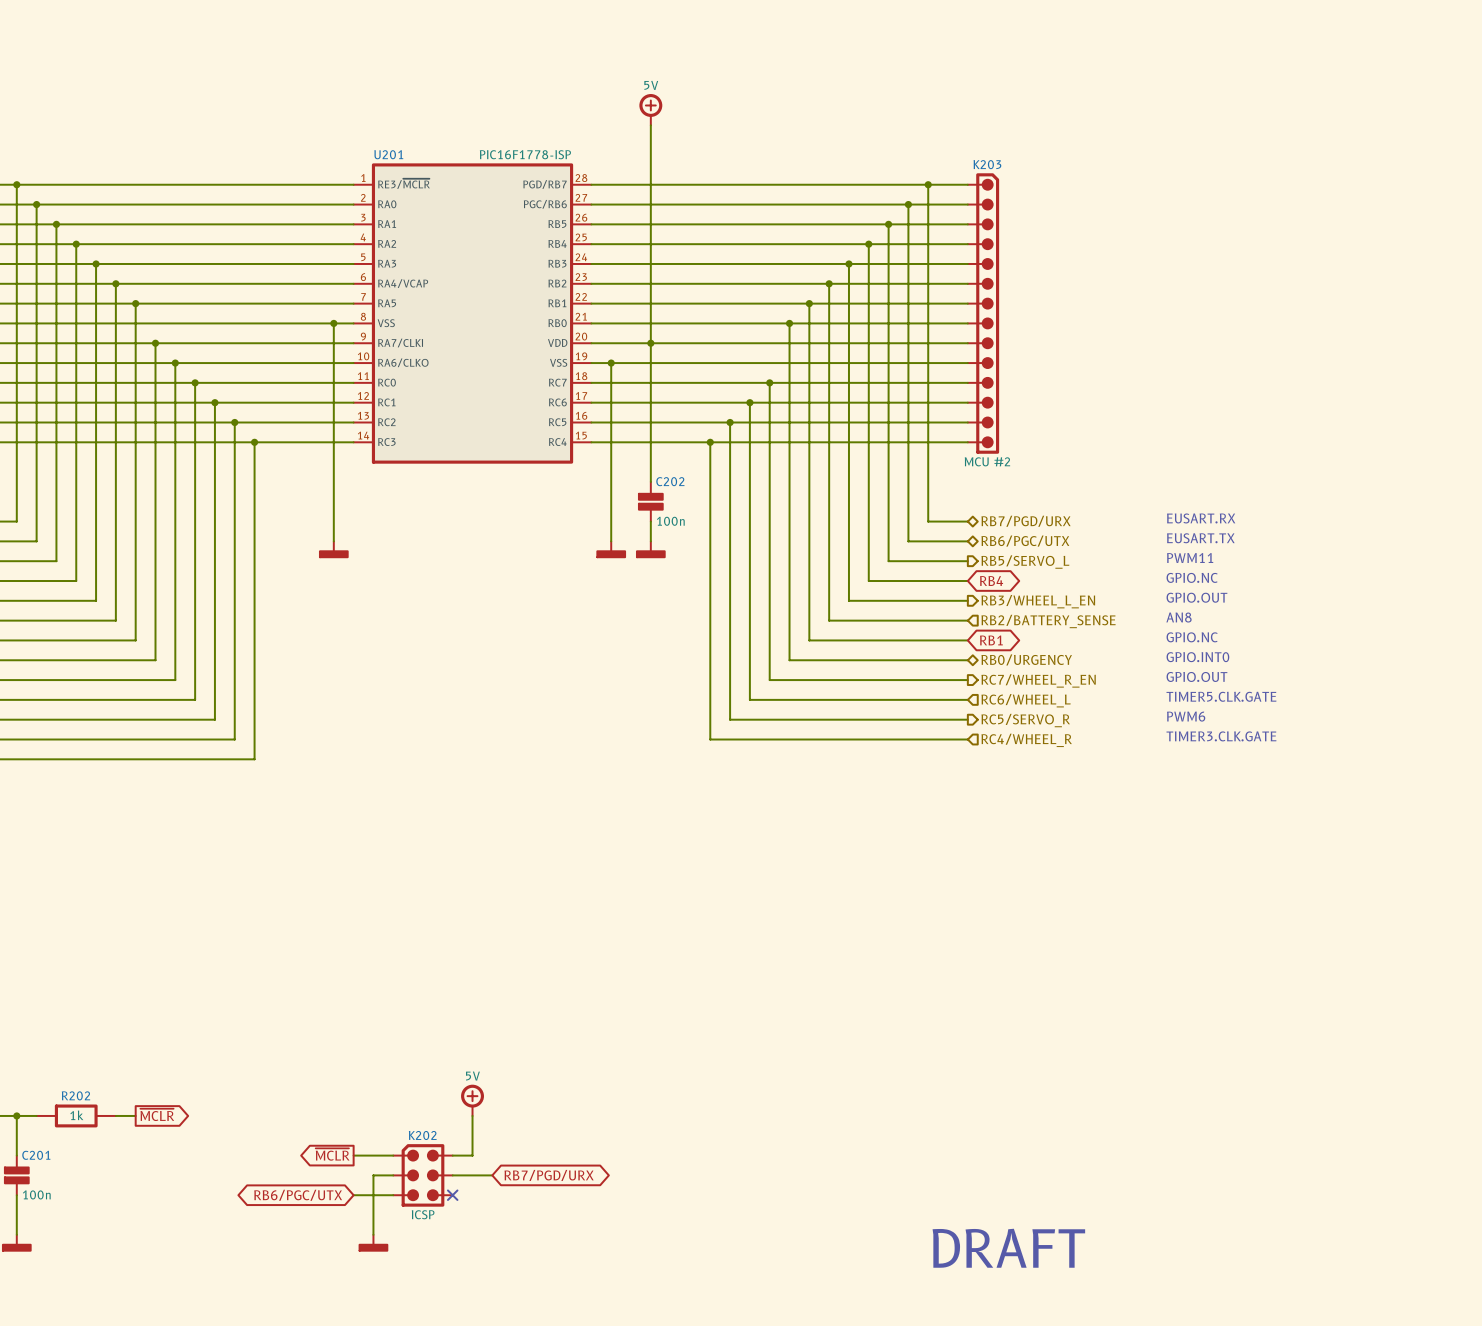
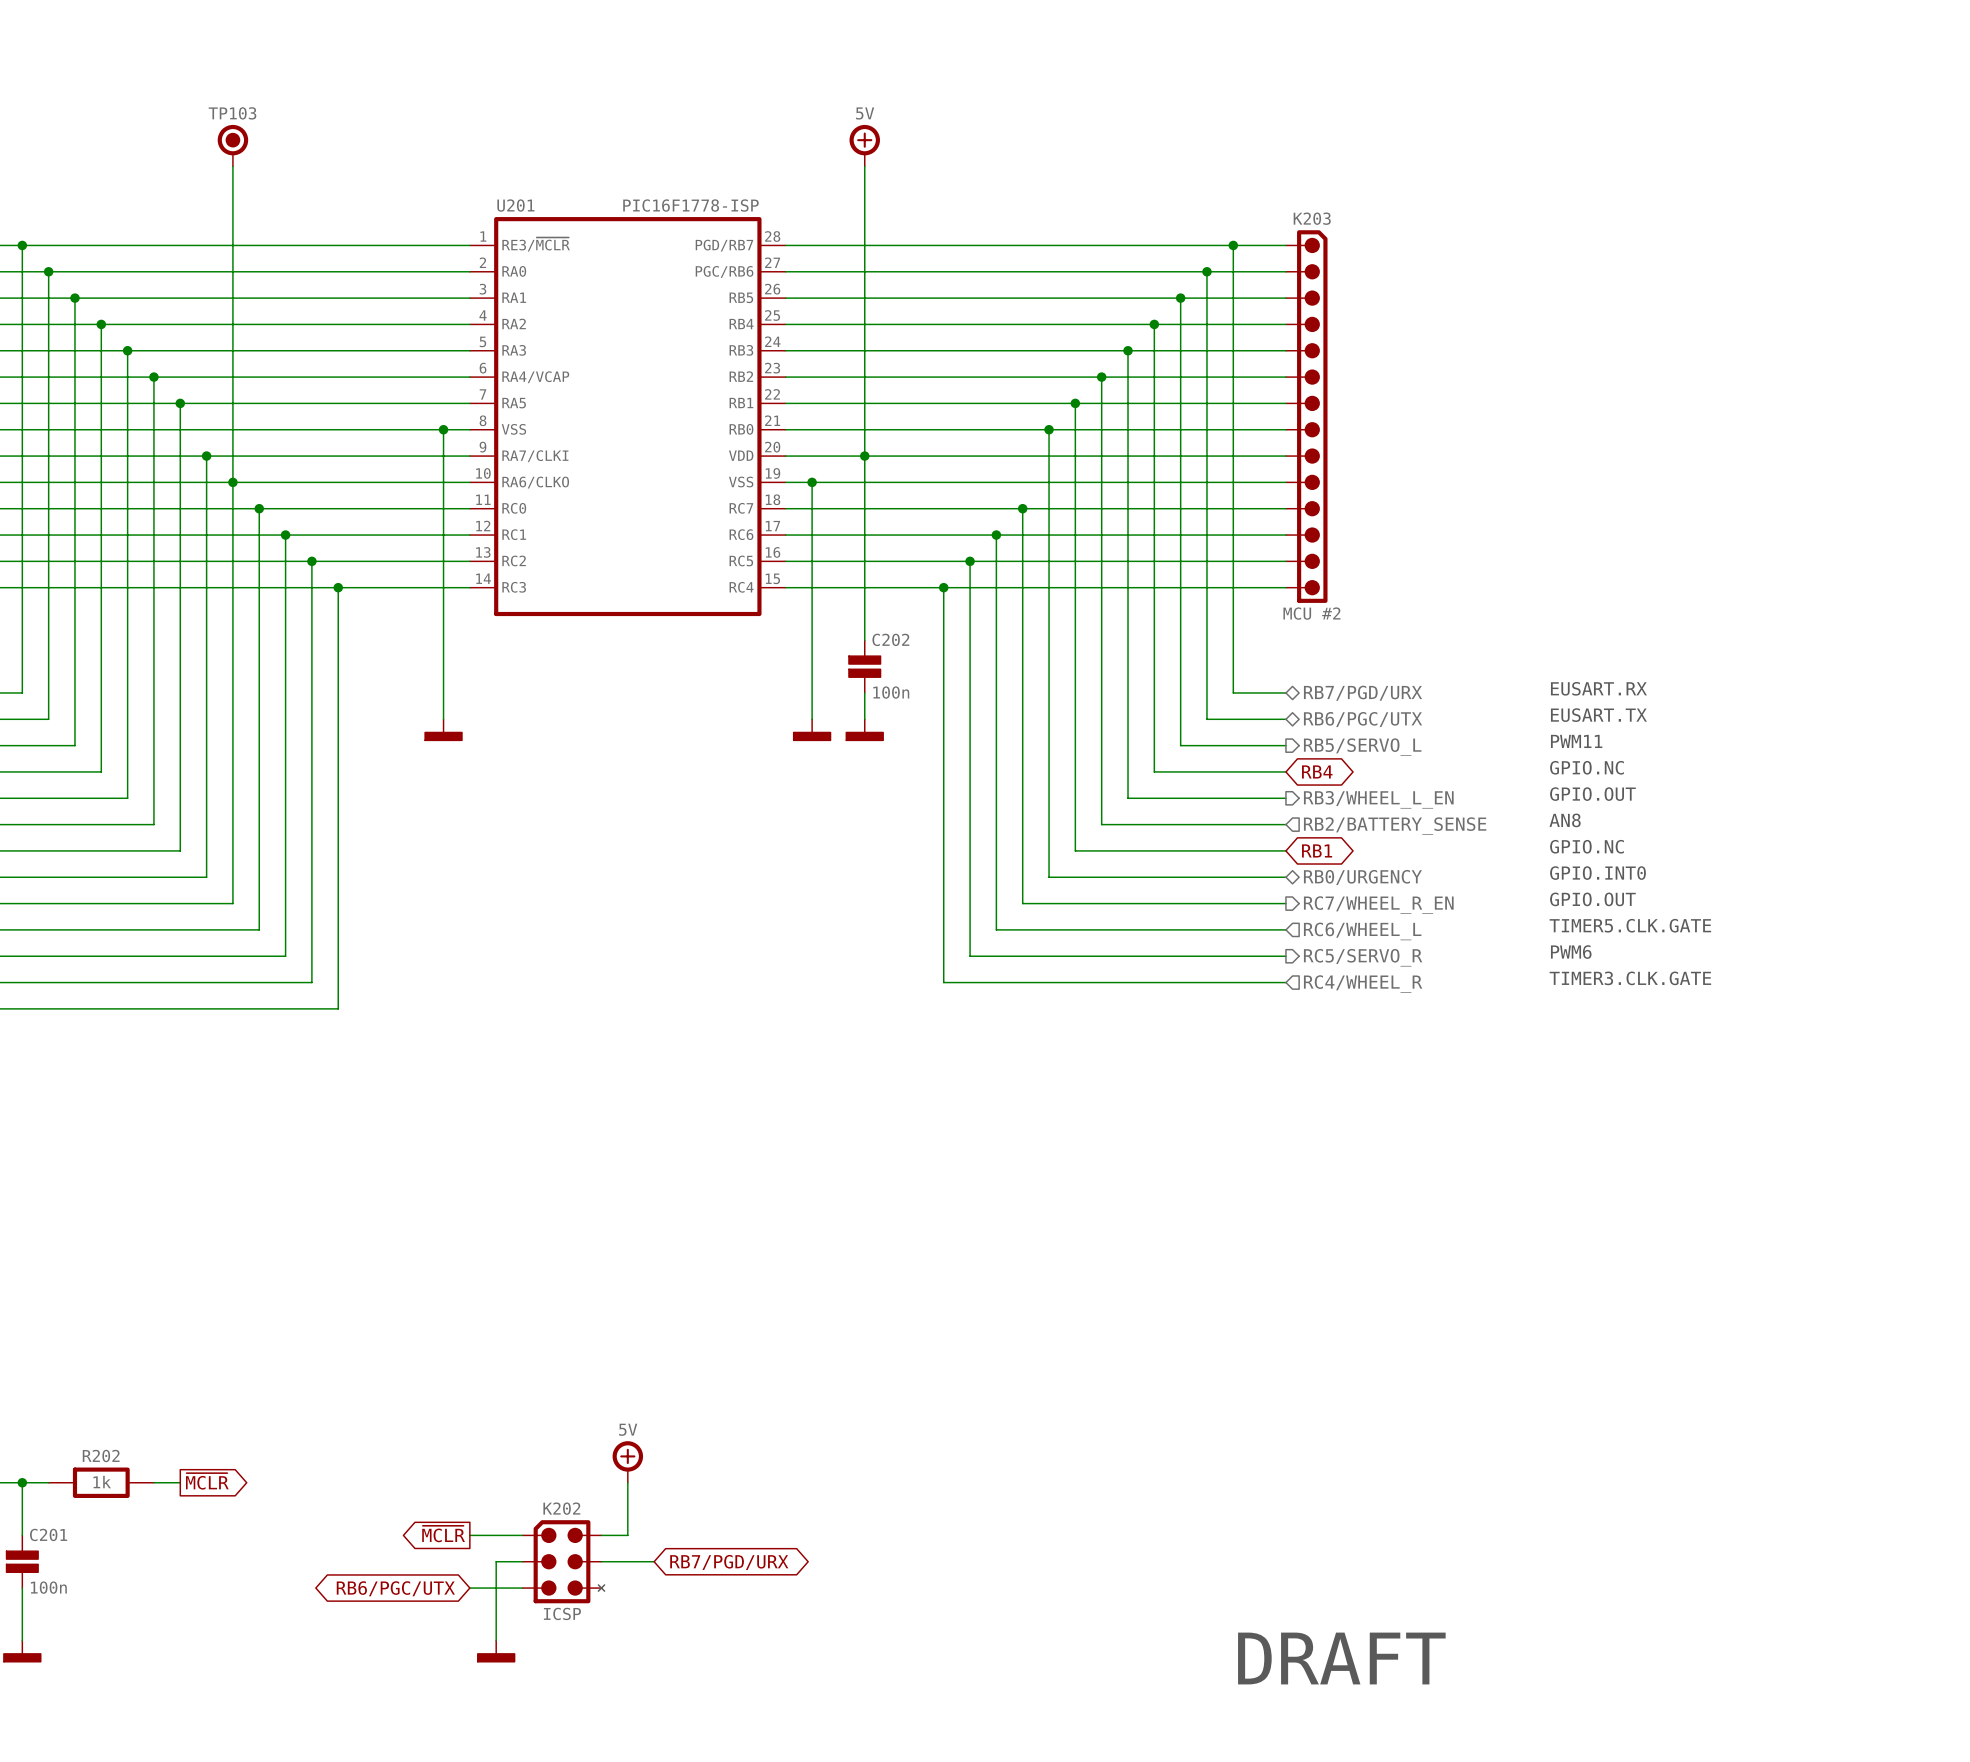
TP103: none -> (232, 145)
wire: none -> (232, 166) (232, 482)
K202 symbol: [393, 1144, 453, 1207] -> [522, 1520, 605, 1604]
no-connect mark: (452, 1195) -> none

